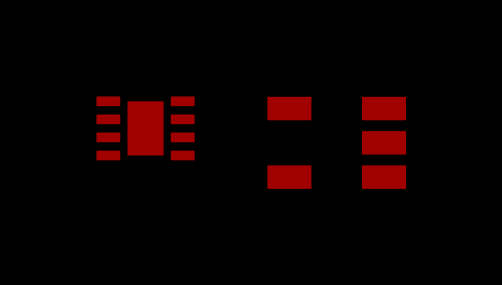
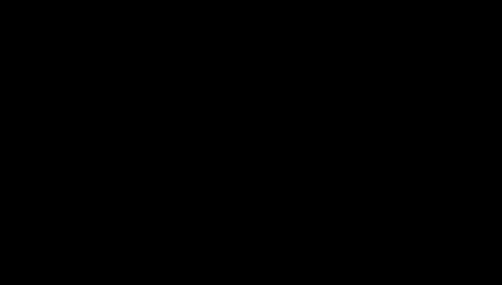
part: (145, 128) -> none
part: (336, 142) -> none

